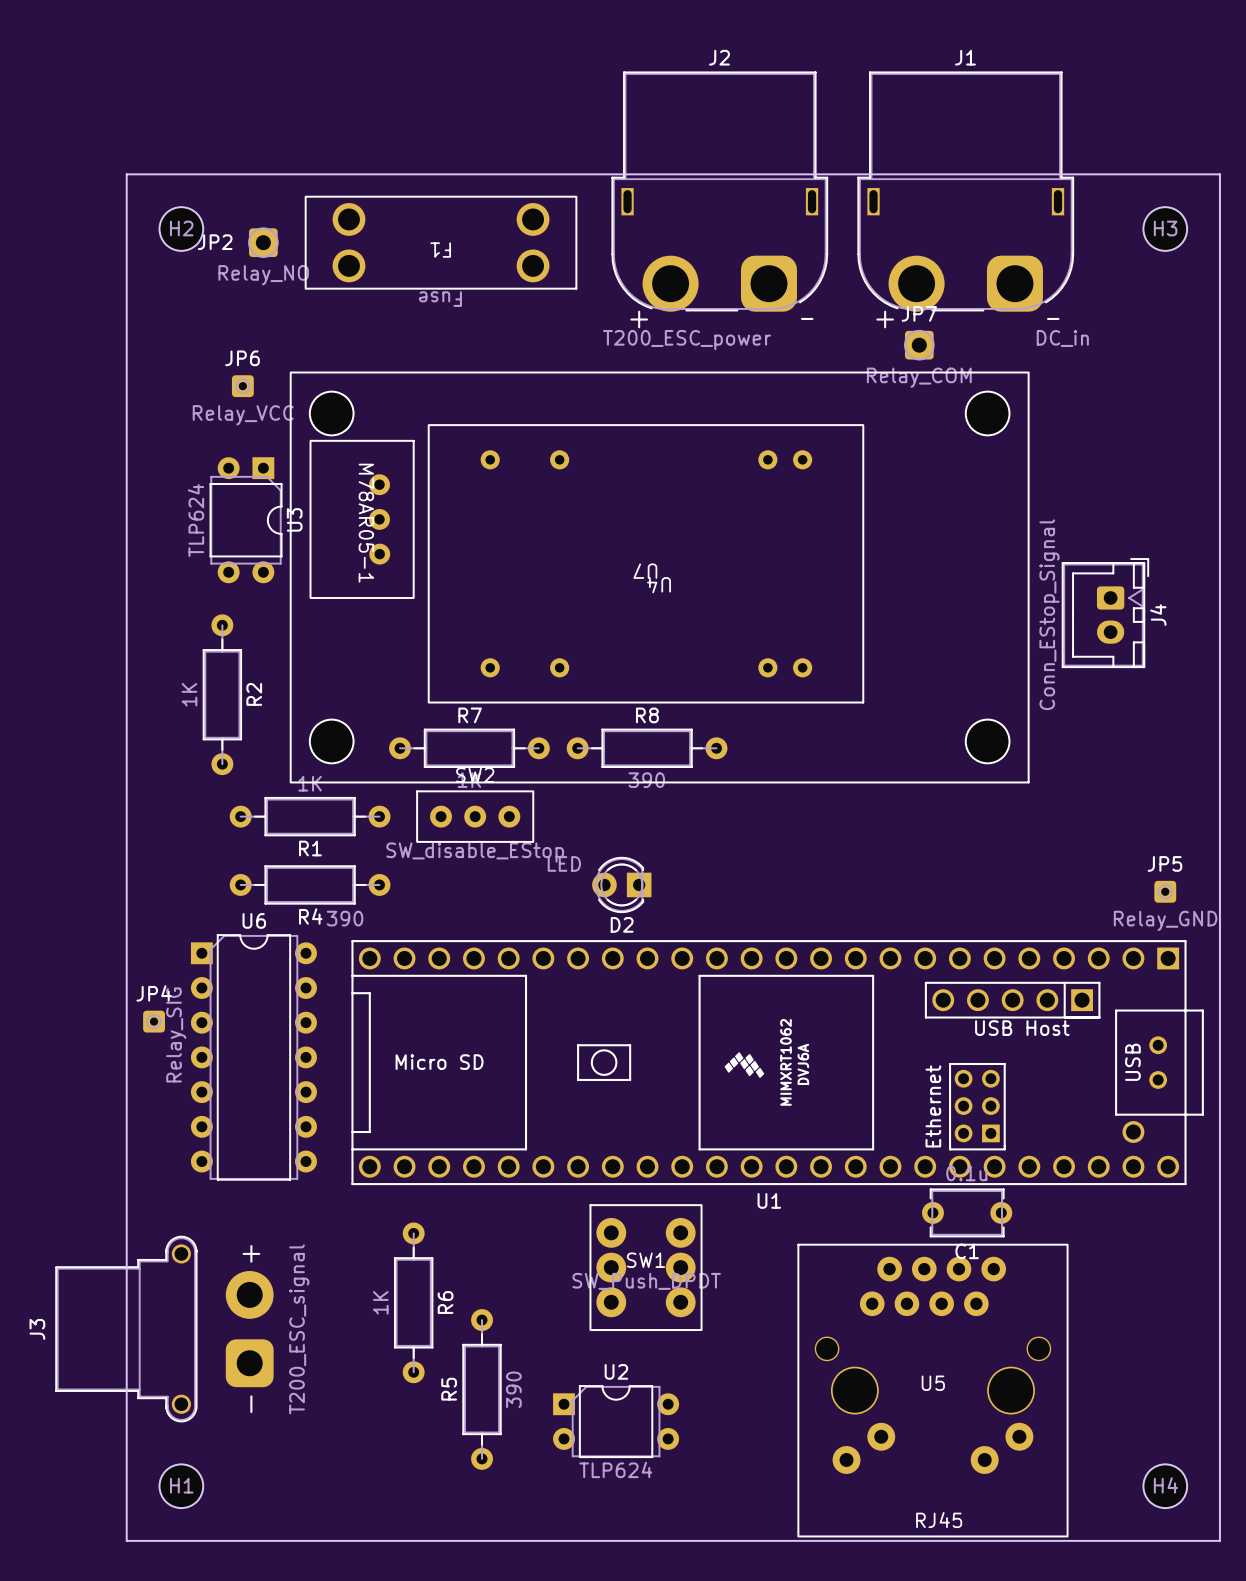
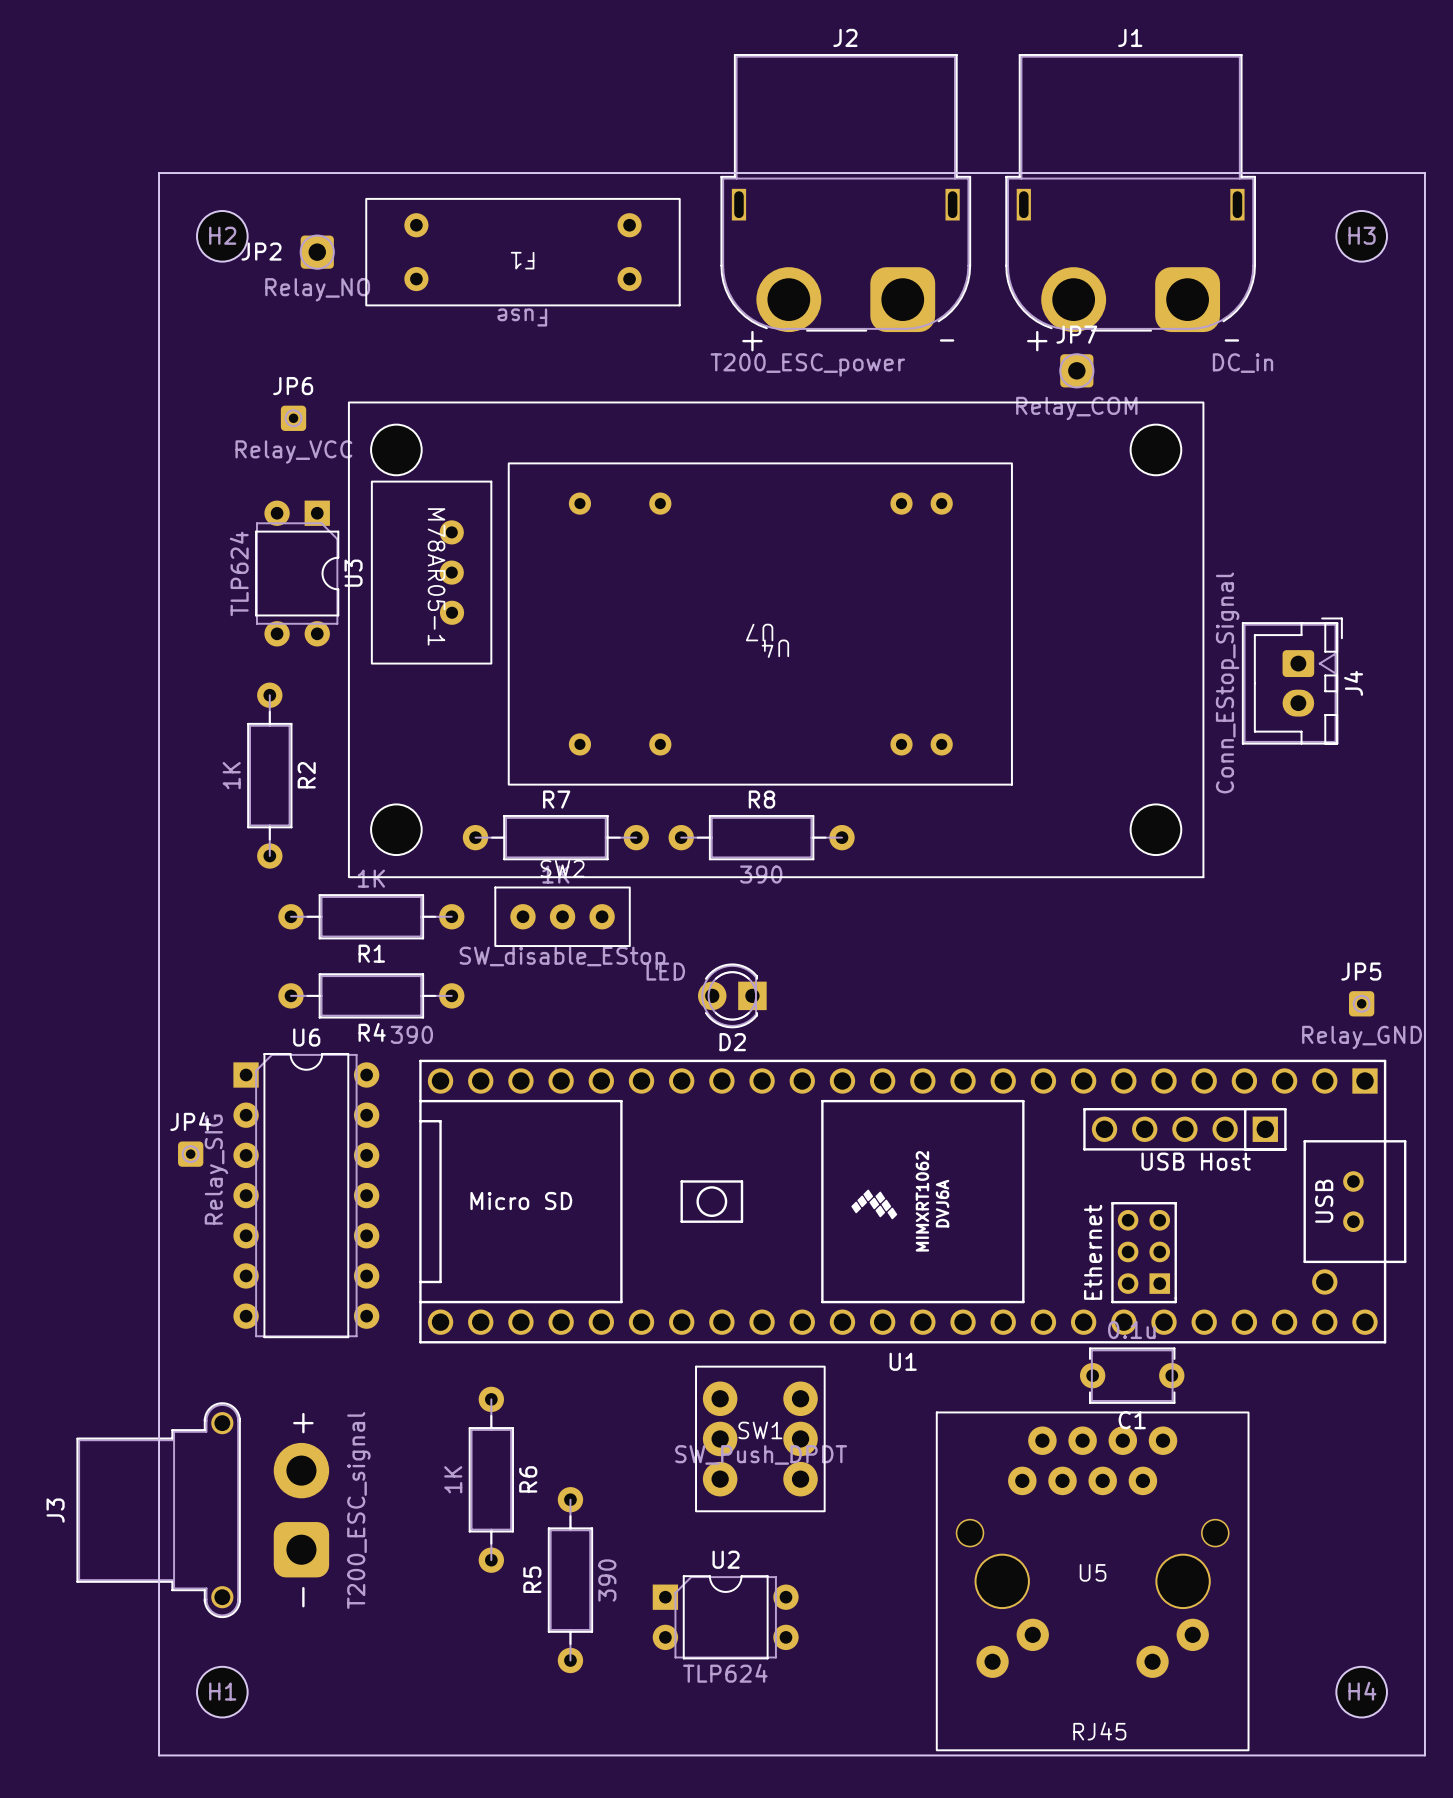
F1 footprint: [304, 196, 578, 290] -> [365, 198, 681, 307]

